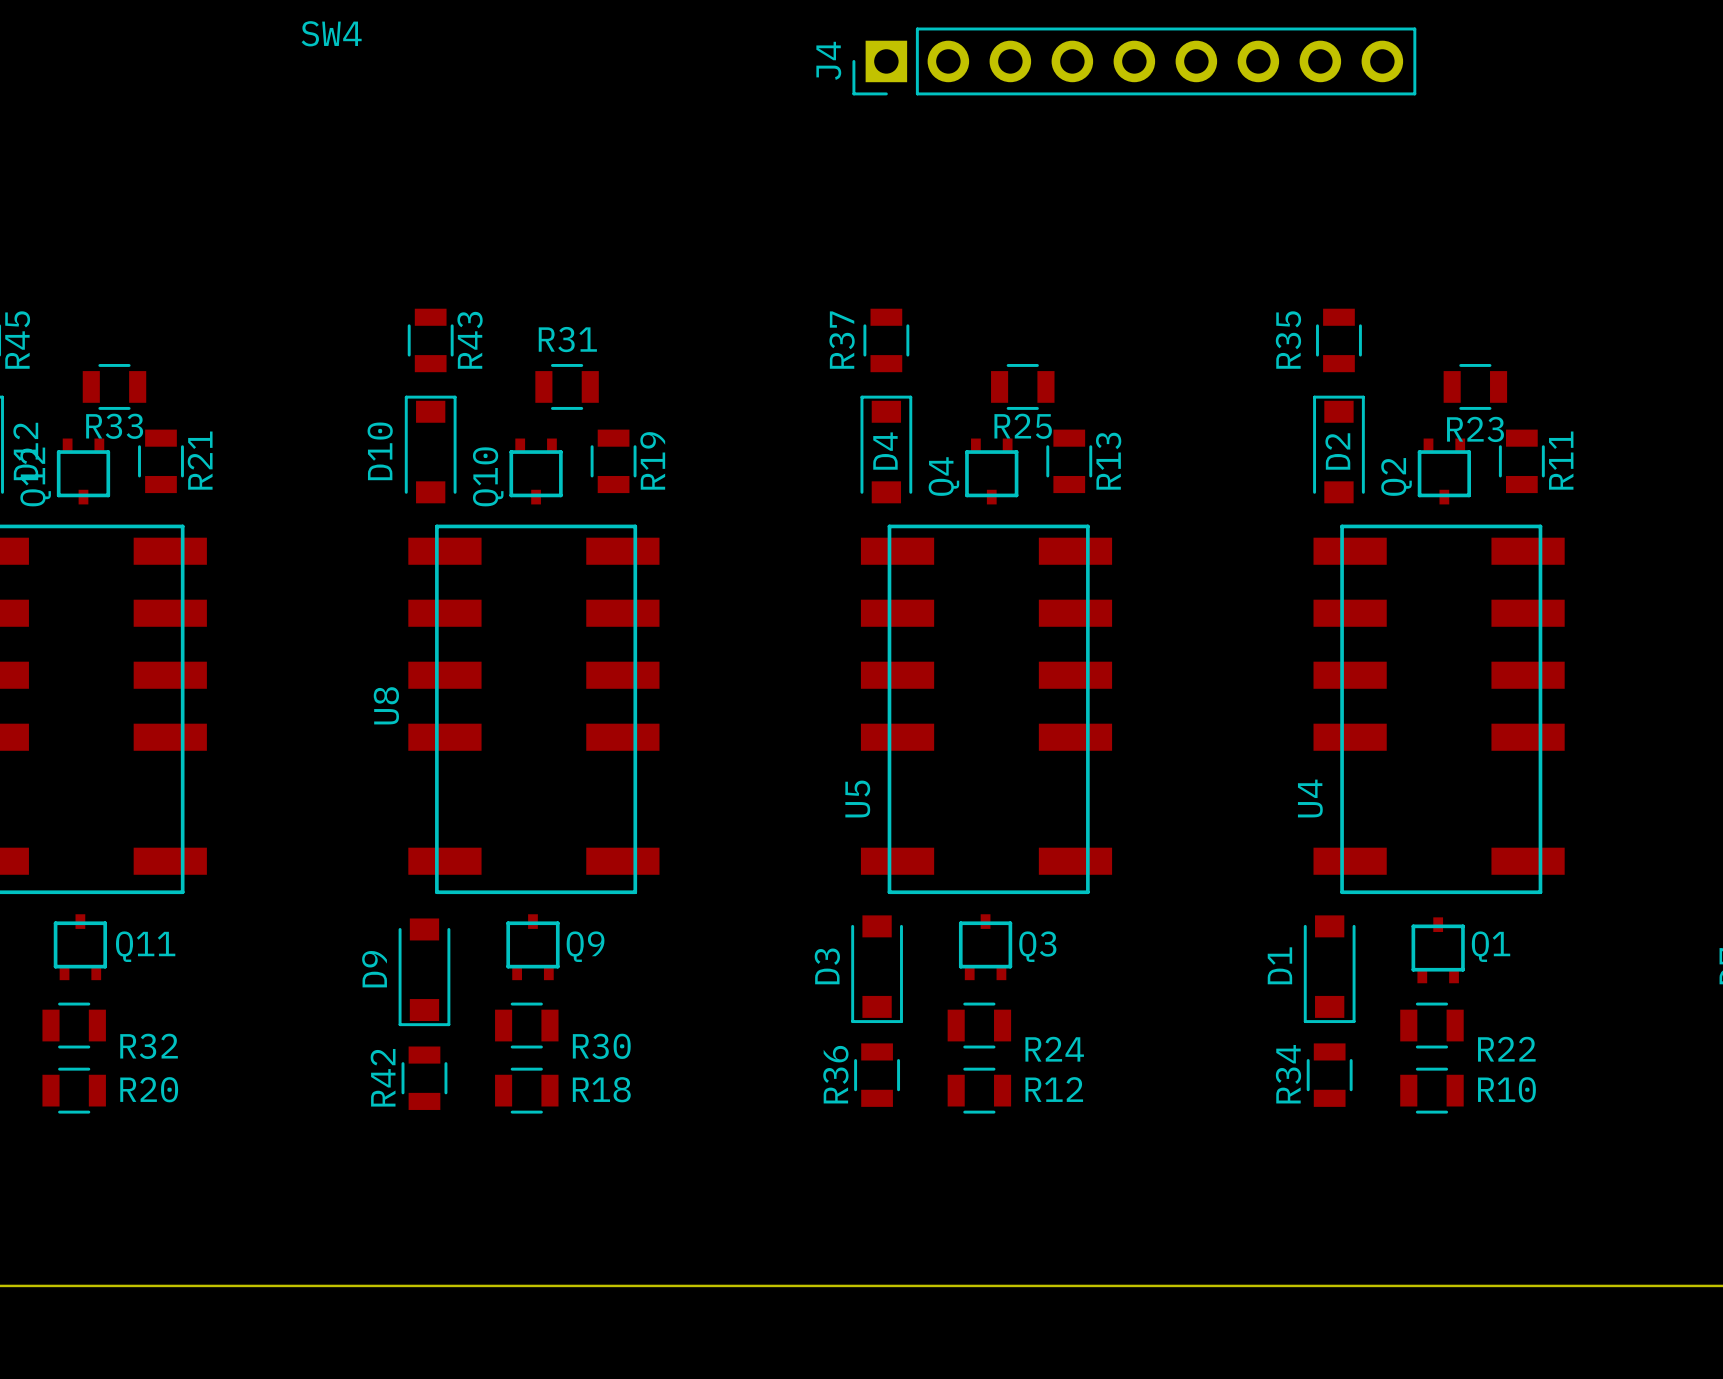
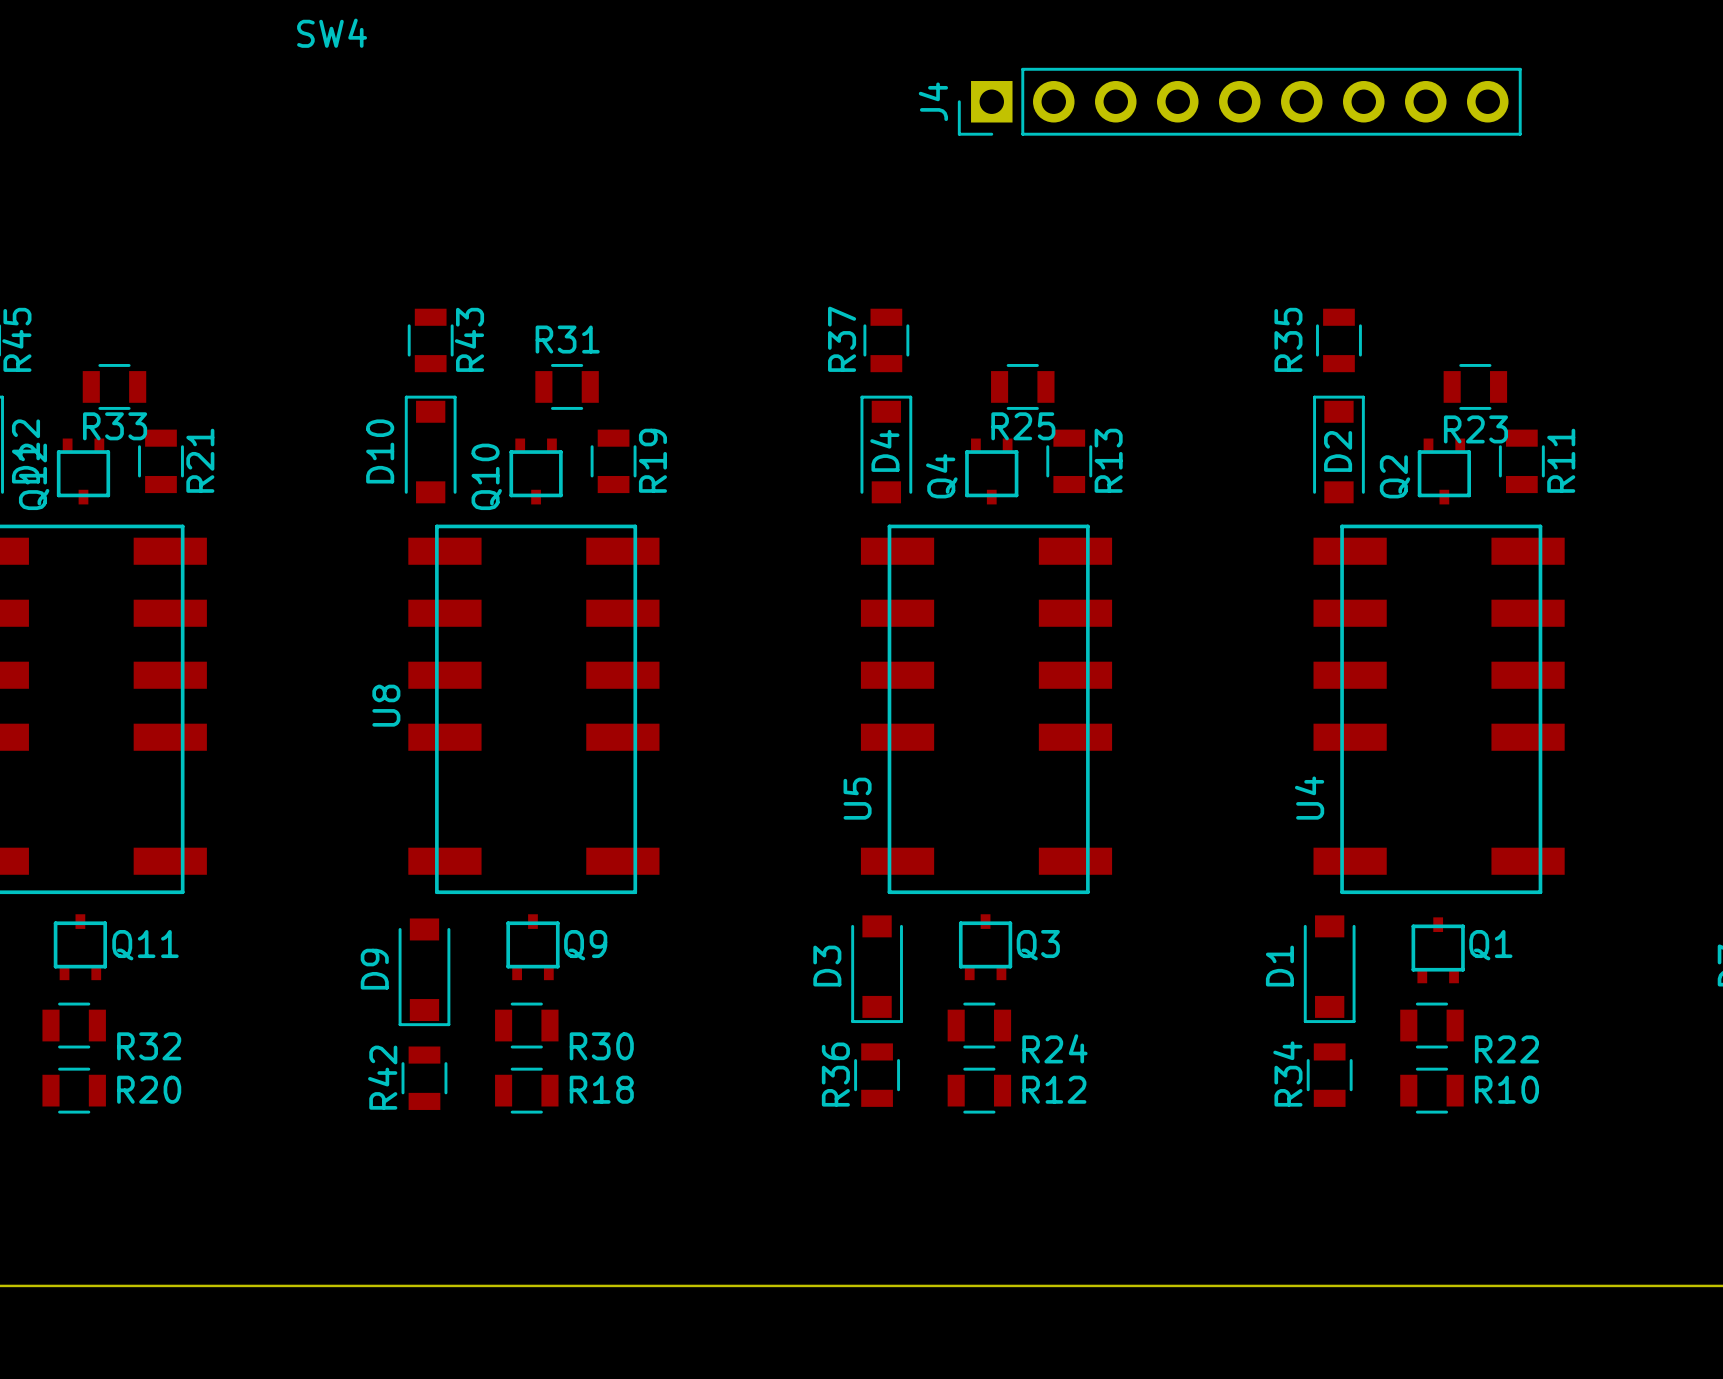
J4 position: (1134, 61) -> (1239, 101)

